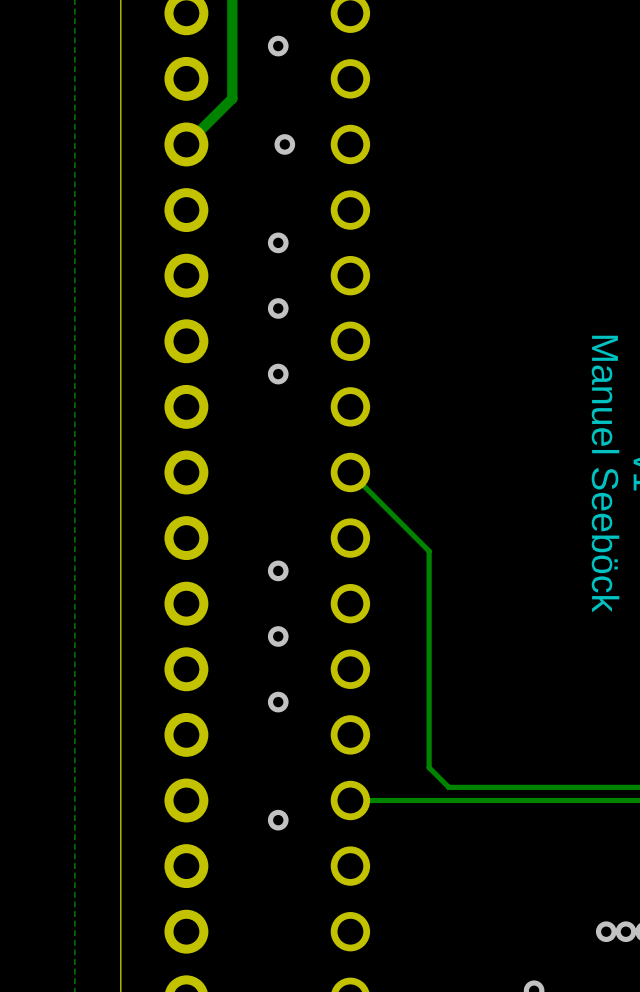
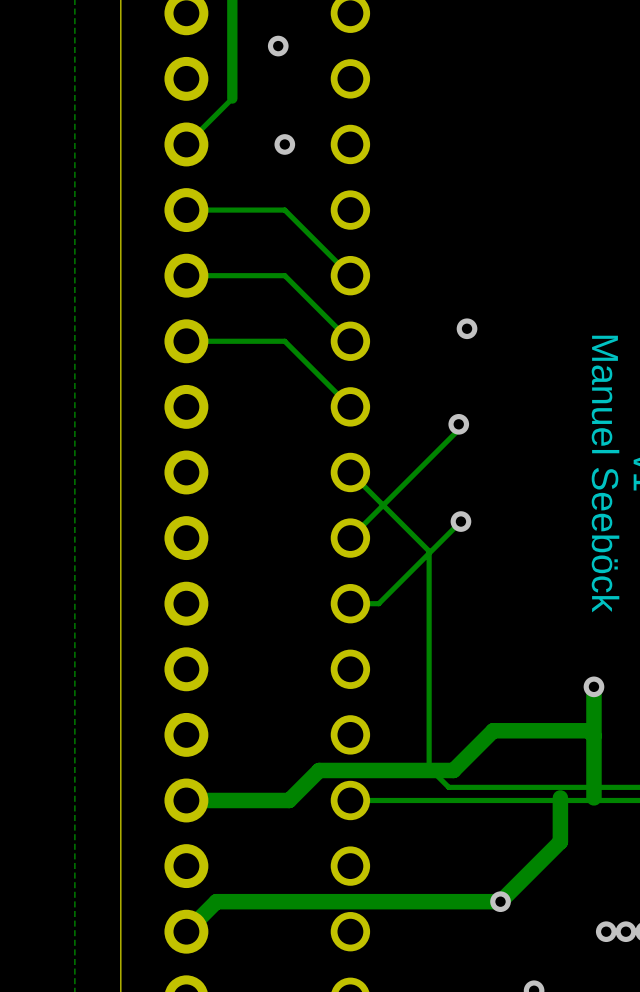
track width: thick (232, 98) (186, 144) -> thin (232, 98) (186, 144)
track: none -> (186, 210) (284, 210) (350, 275)
via: (278, 242) -> none
track: none -> (186, 275) (284, 275) (350, 341)
via: (278, 308) -> none
via: none -> (467, 328)
track: none -> (186, 341) (284, 341) (350, 406)
via: (278, 374) -> none
track: none -> (458, 424) (458, 429) (350, 538)
via: none -> (458, 424)
track: none -> (460, 521) (378, 603) (350, 603)
via: none -> (460, 521)
via: (278, 570) -> none
via: (278, 636) -> none
track: none -> (593, 686) (593, 797)
via: none -> (593, 686)
via: (278, 702) -> none
track: none -> (593, 735) (588, 730) (493, 730) (453, 770) (319, 770) (289, 800) (186, 800)
track: none -> (560, 797) (560, 841) (500, 901) (216, 901) (186, 931)
via: (278, 820) -> none
via: none -> (500, 901)

